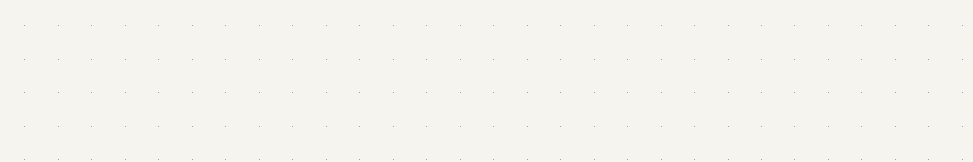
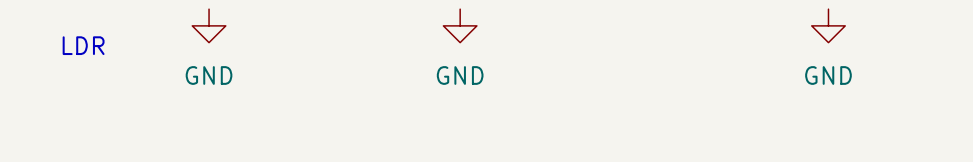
power symbol: none -> GND (209, 25)
power symbol: none -> GND (460, 25)
power symbol: none -> GND (828, 25)
text: none -> LDR (83, 45)

